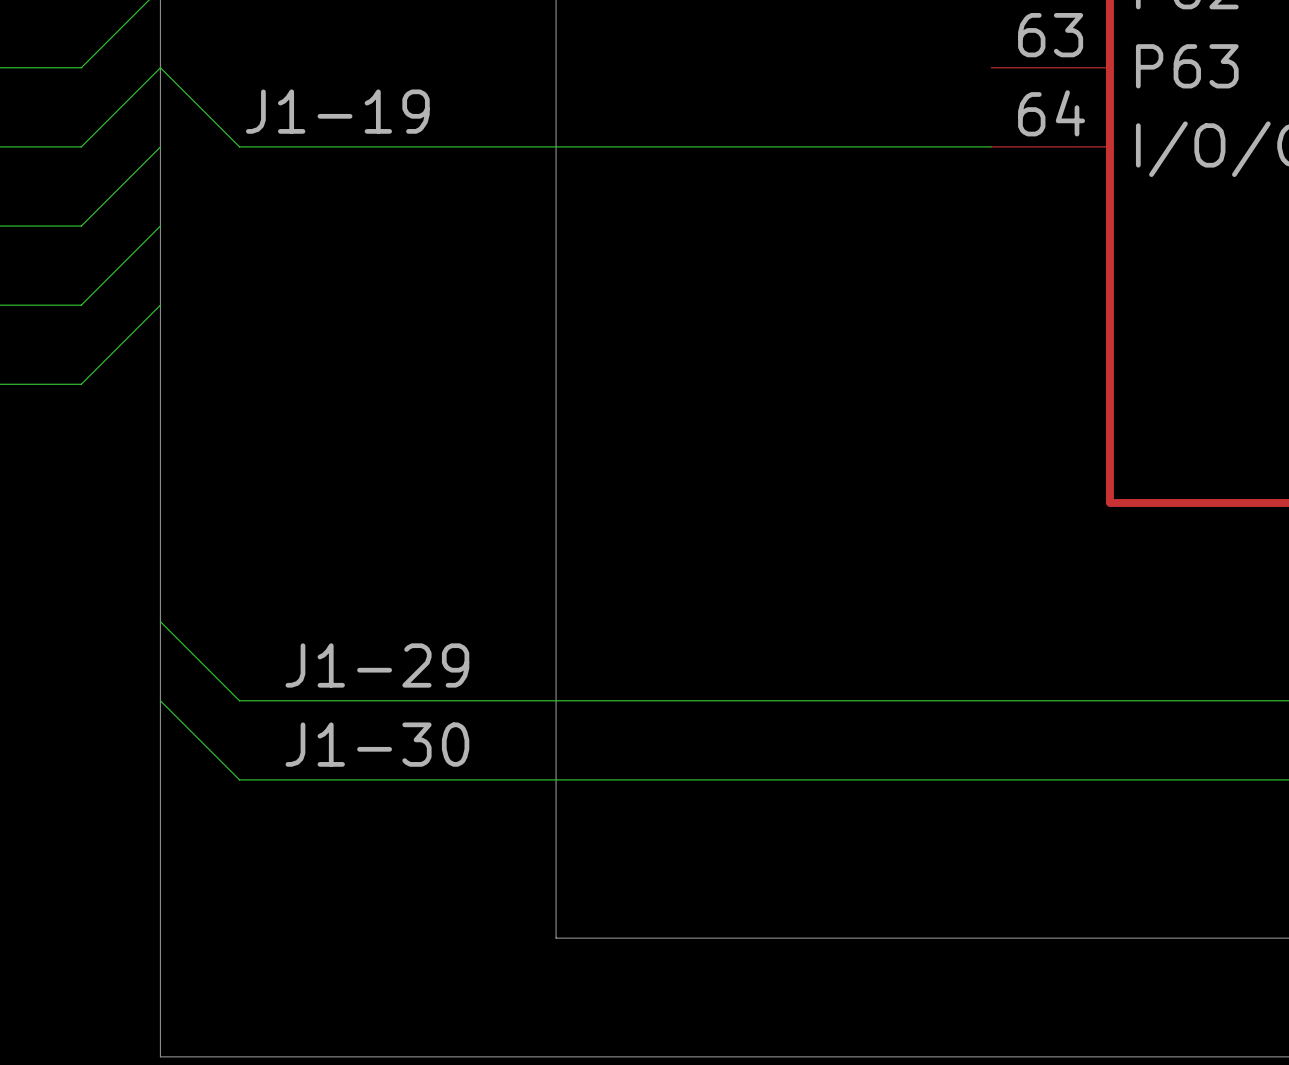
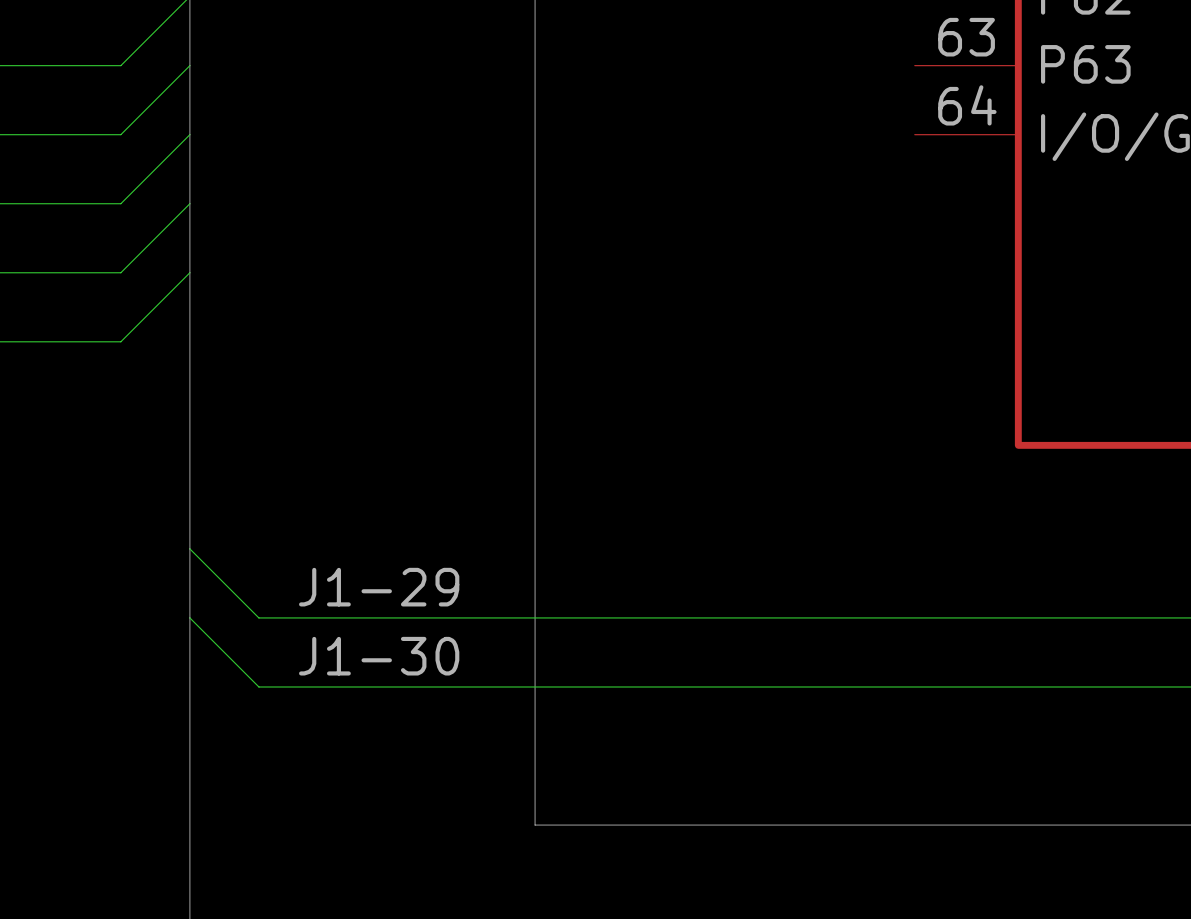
wire: (160, 67) (239, 146) (991, 146) -> none
label: J1-19 (337, 111) -> none

